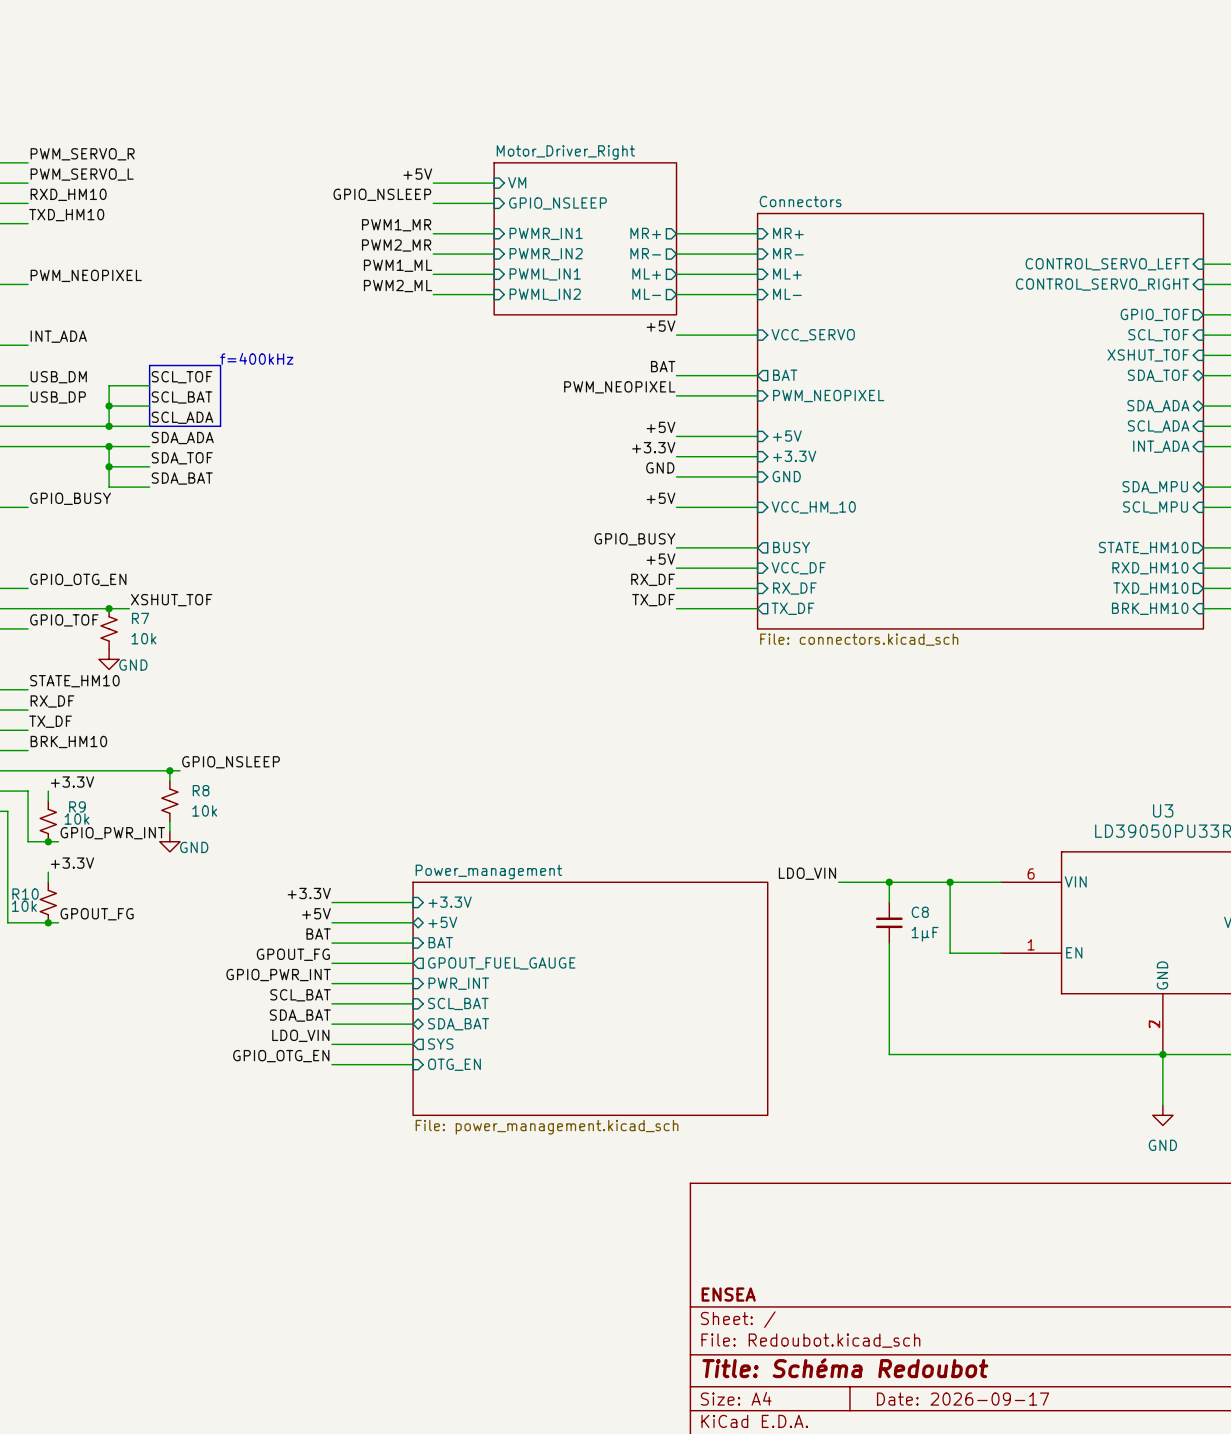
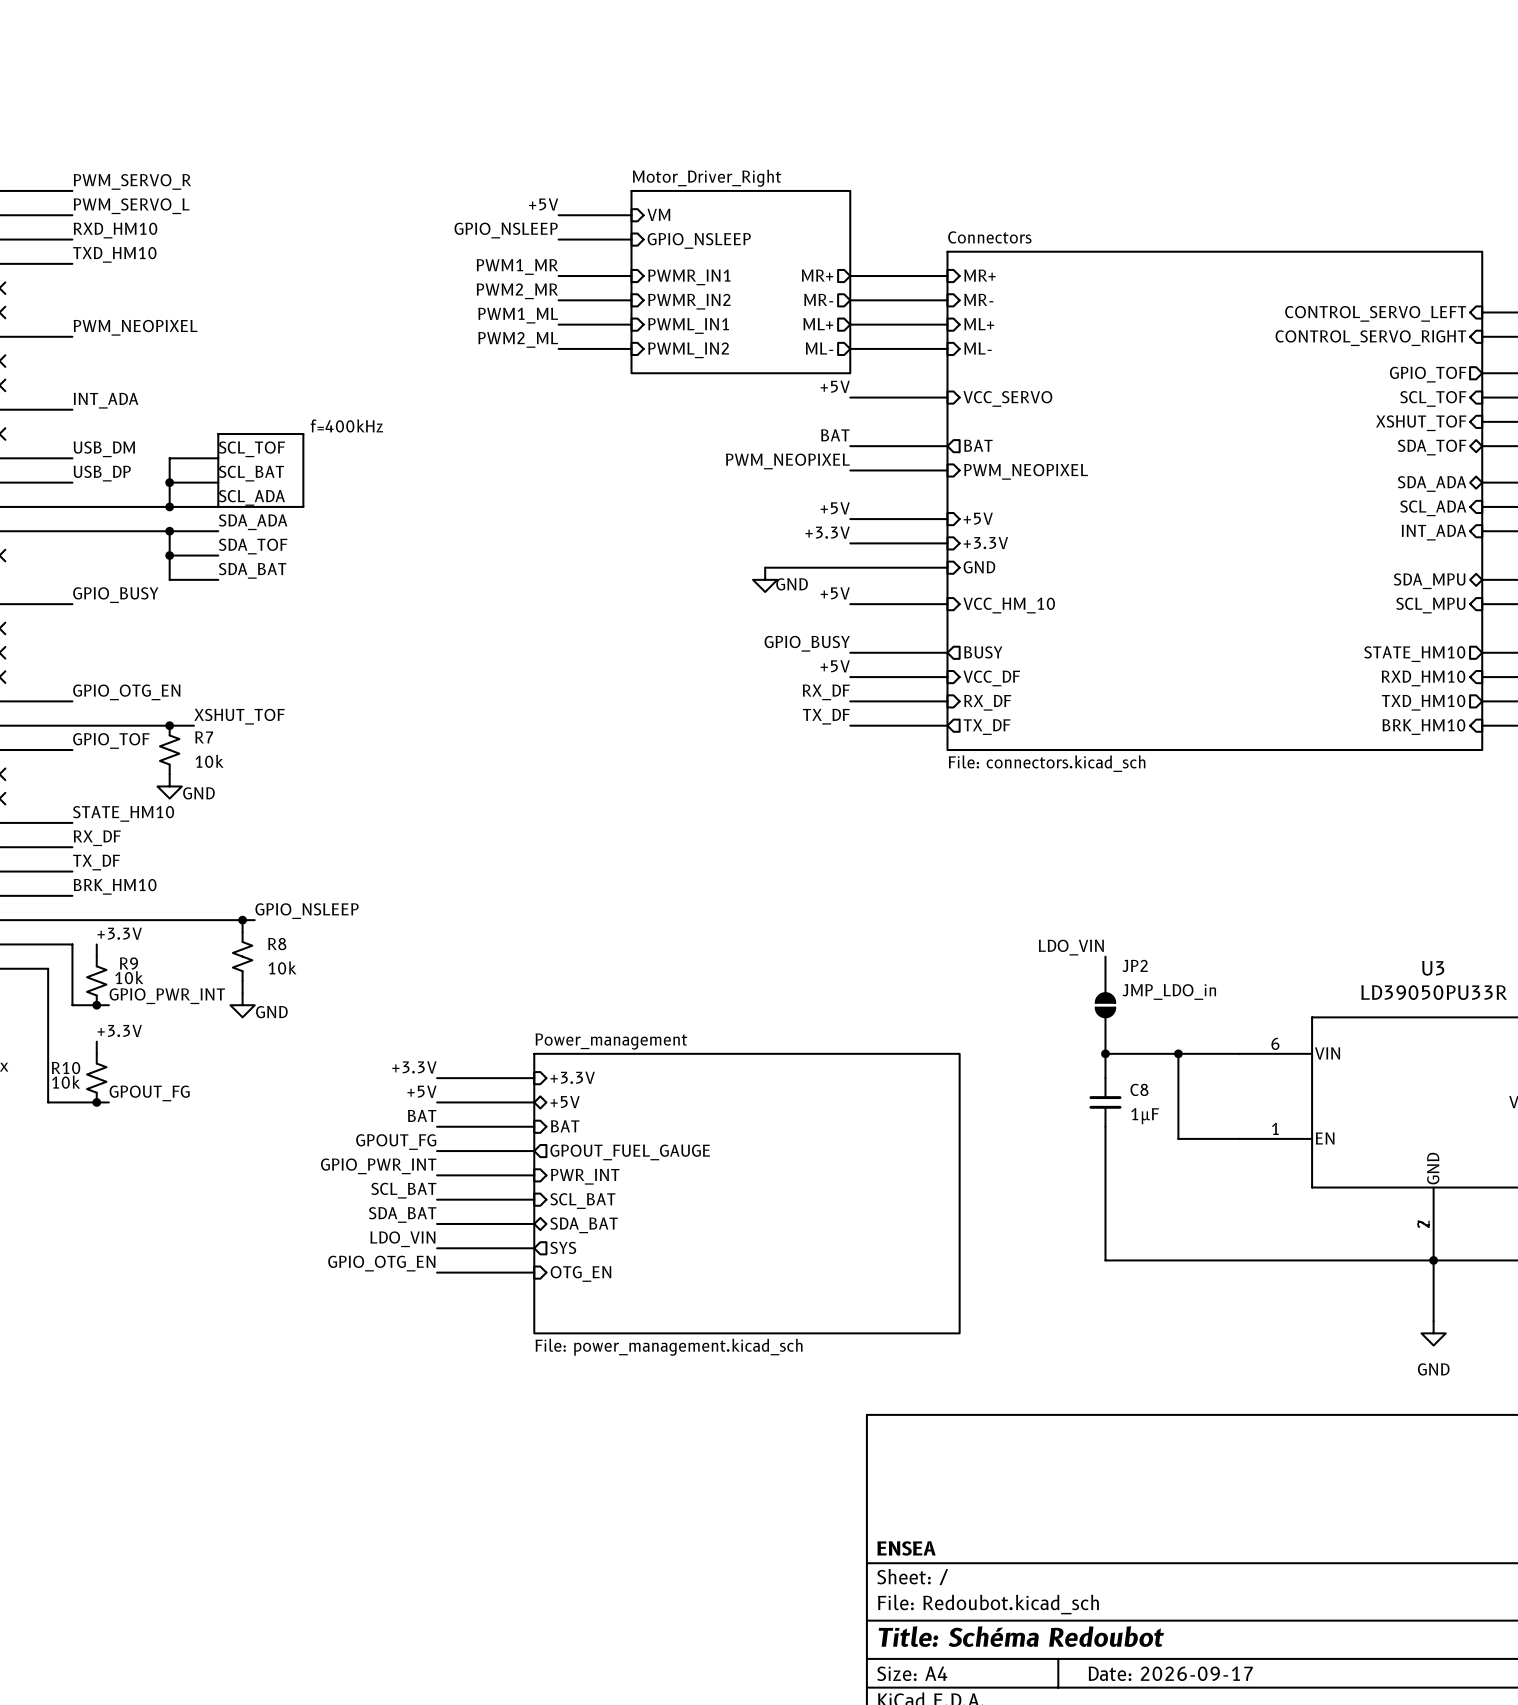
label: GND (660, 467) -> none
wire: none -> (765, 567) (850, 567)
power symbol: none -> GND (765, 579)
JP2: none -> JMP_LDO_in (1105, 1005)
label position: LDO_VIN (807, 873) -> LDO_VIN (1071, 947)
wire: (838, 882) (889, 882) -> none

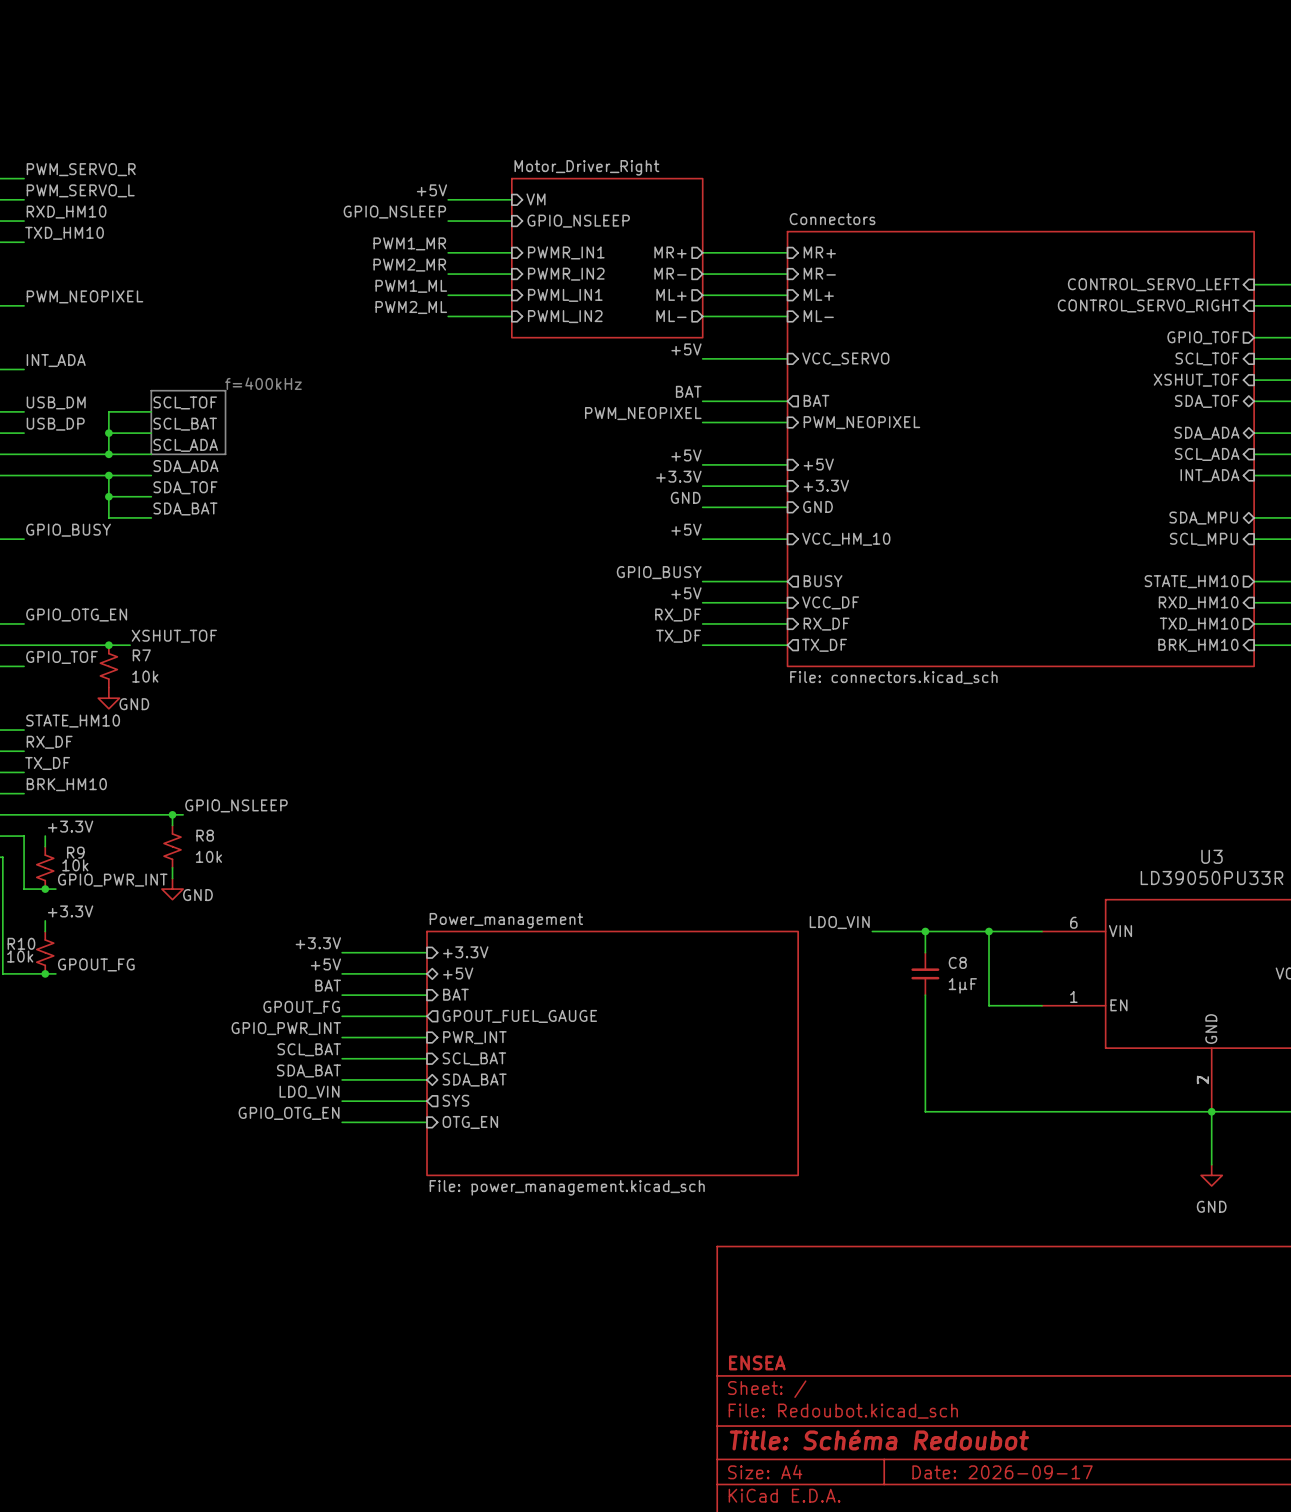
label: none -> GND (685, 497)
wire: (765, 567) (850, 567) -> none
power symbol: GND (765, 579) -> none
label position: LDO_VIN (1071, 947) -> LDO_VIN (839, 922)
JP2: JMP_LDO_in (1105, 1005) -> none
wire: none -> (872, 931) (925, 931)

